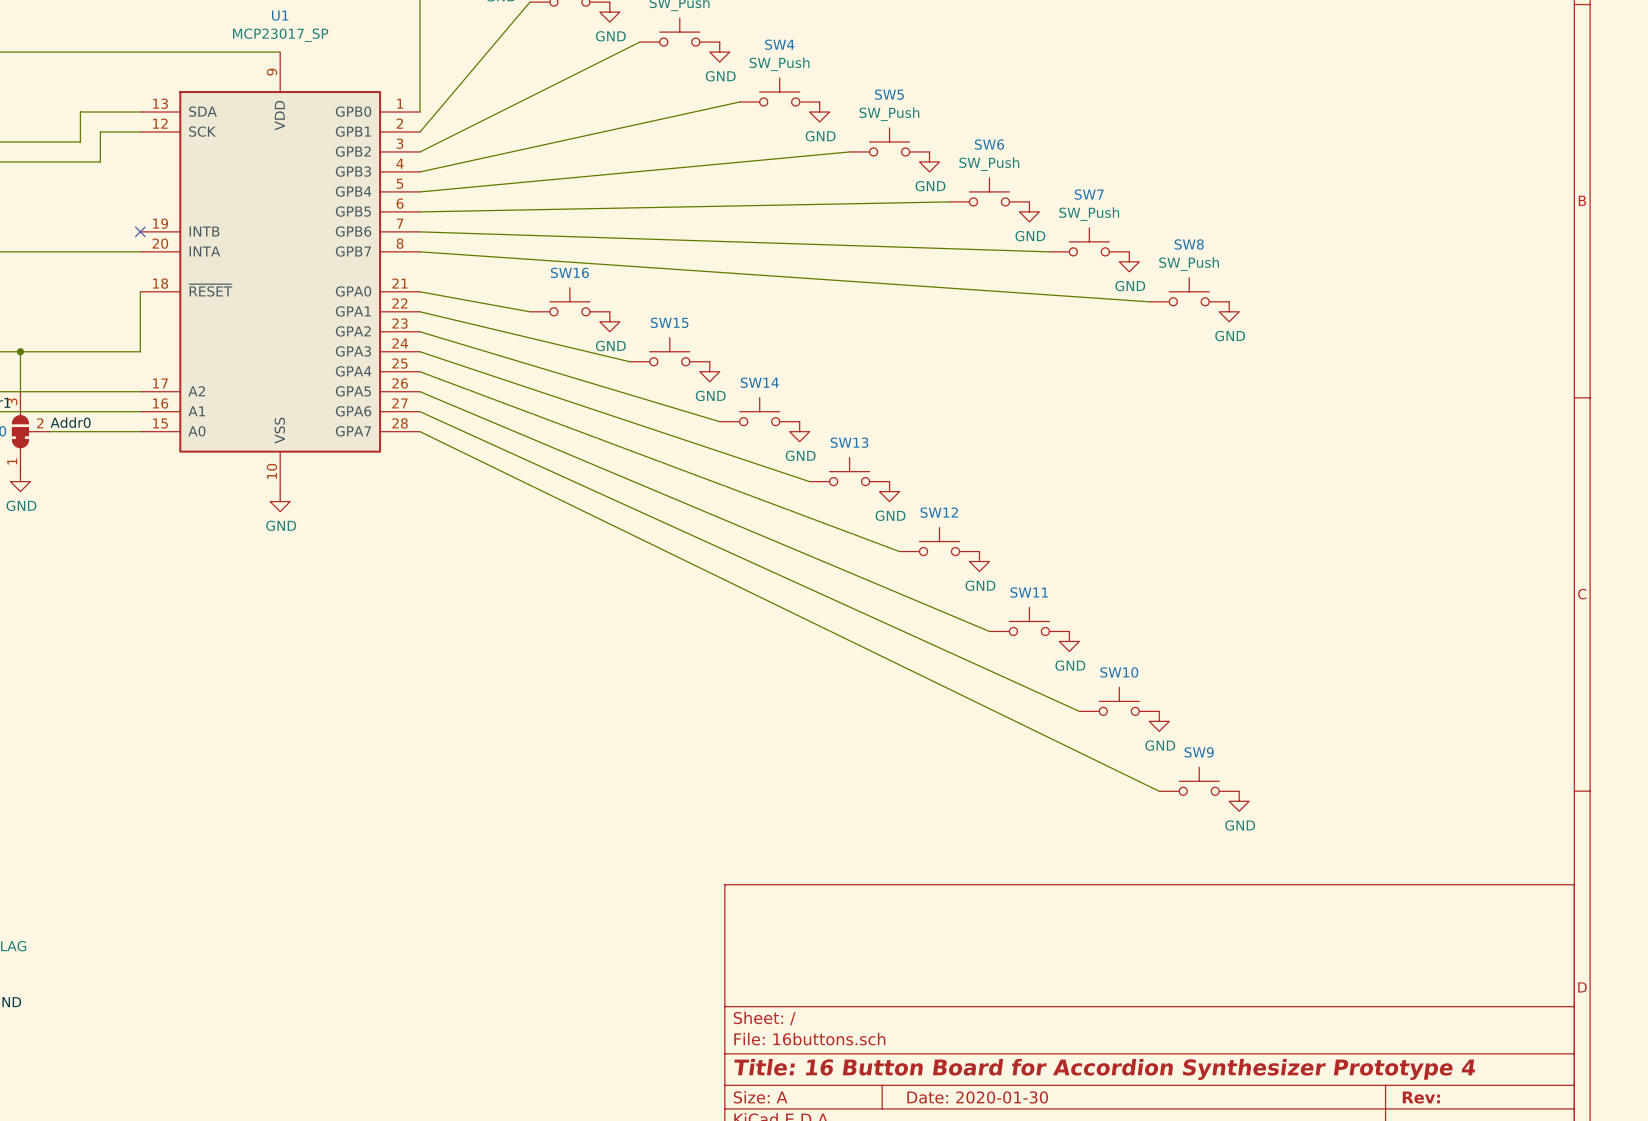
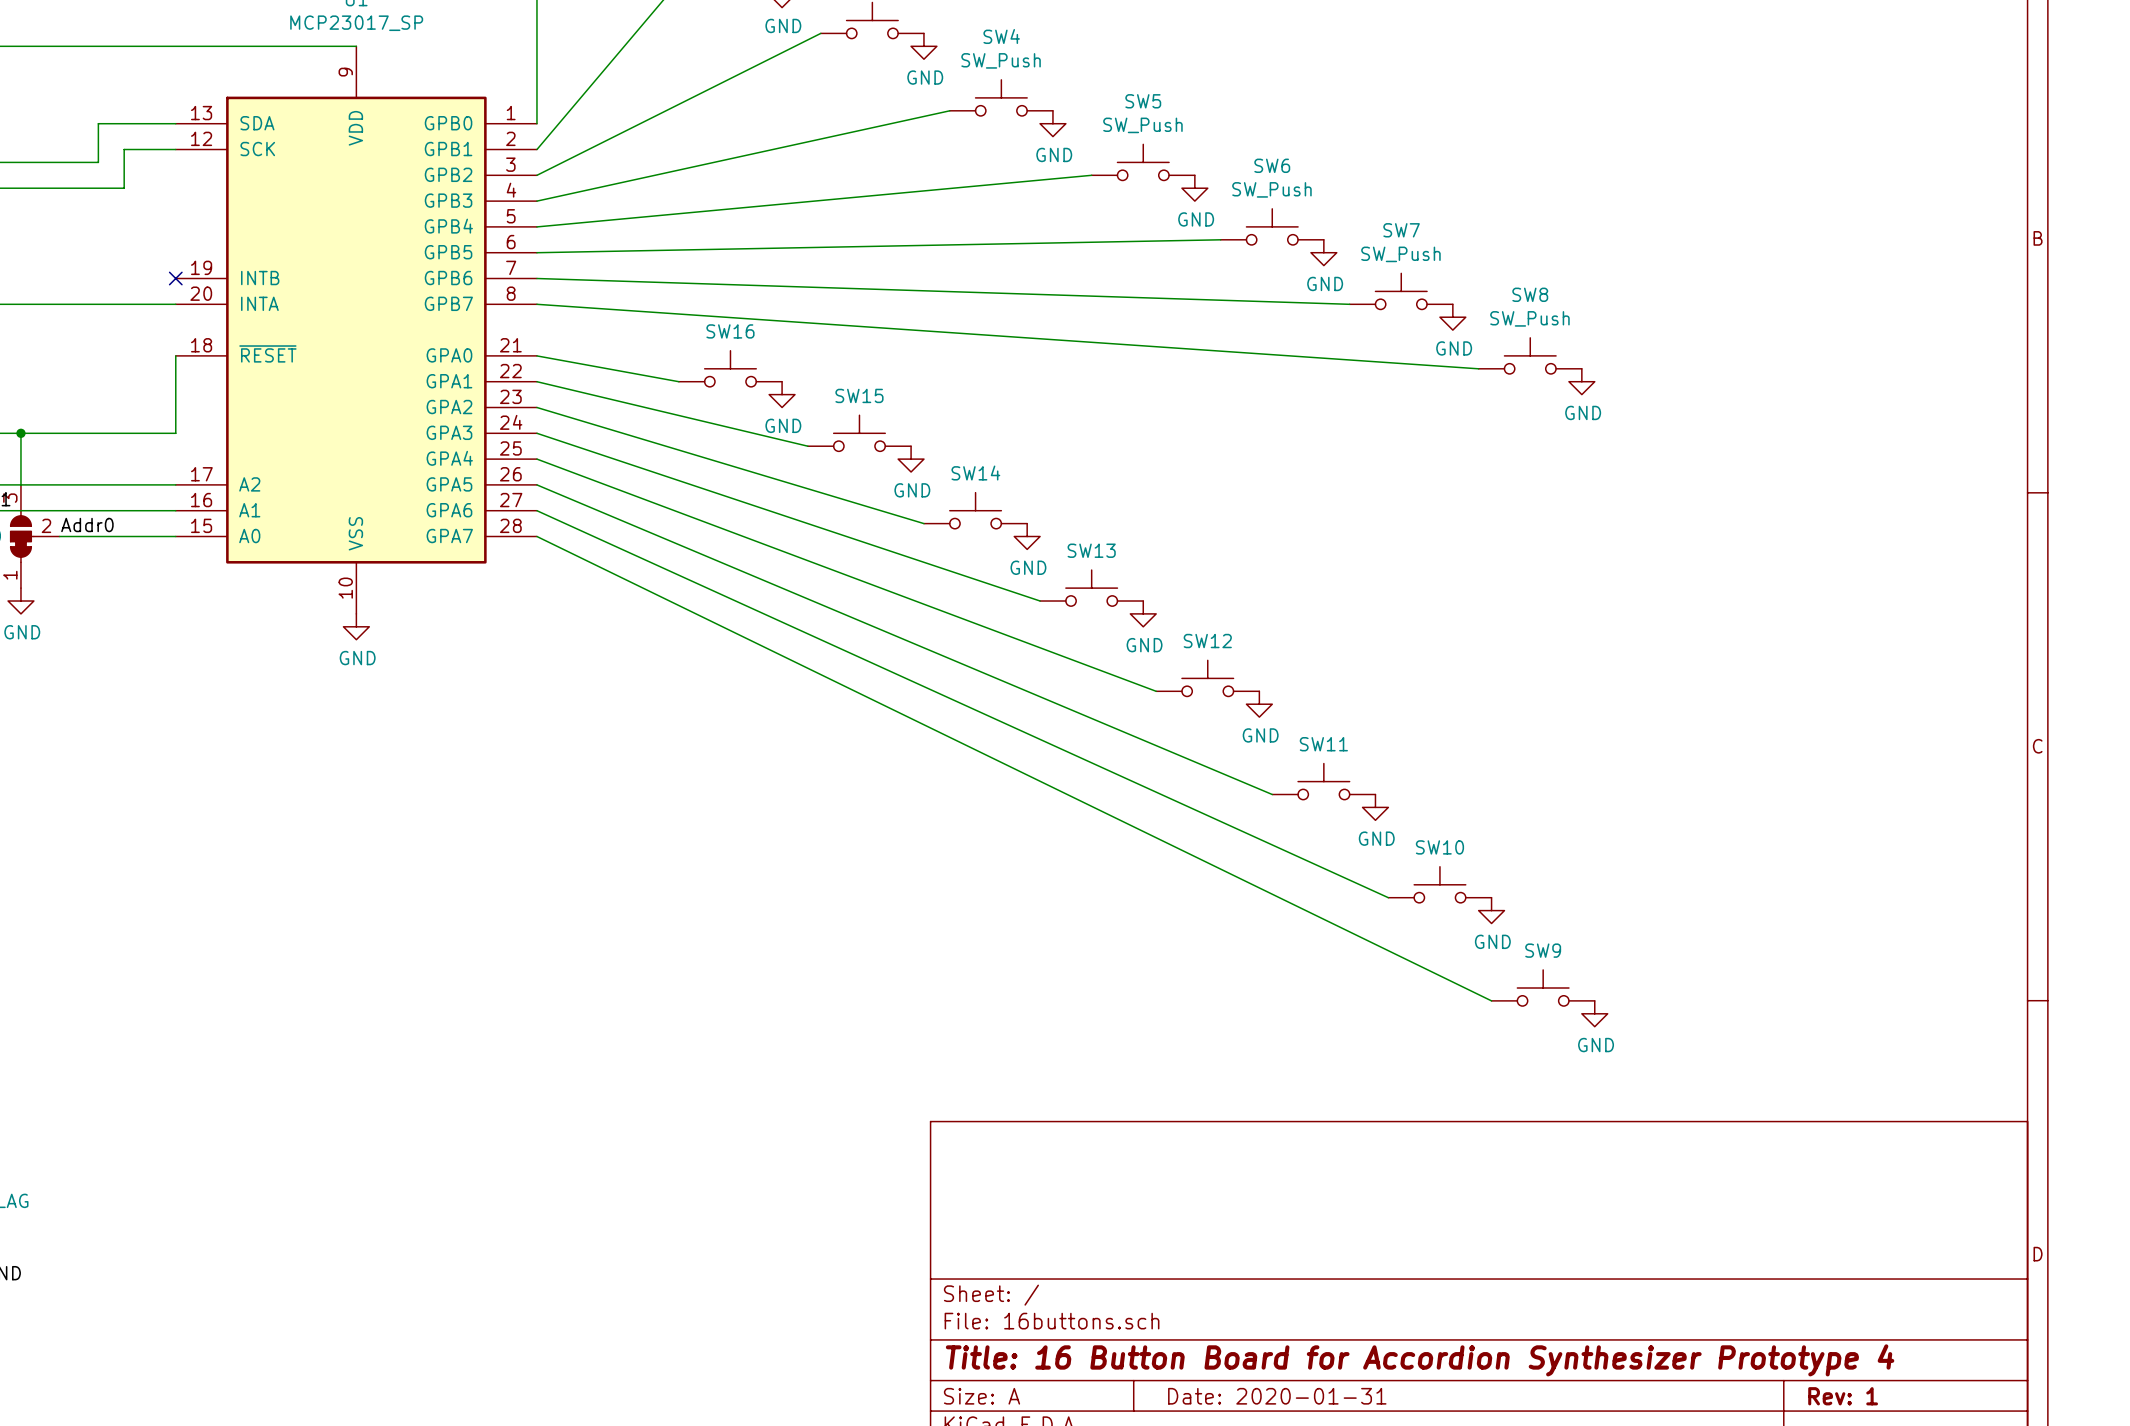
title block: Date: 2020-01-30 (977, 1097) -> Date: 2020-01-31 (1277, 1396)
title block: Rev: (1421, 1097) -> Rev: 1 (1843, 1396)

